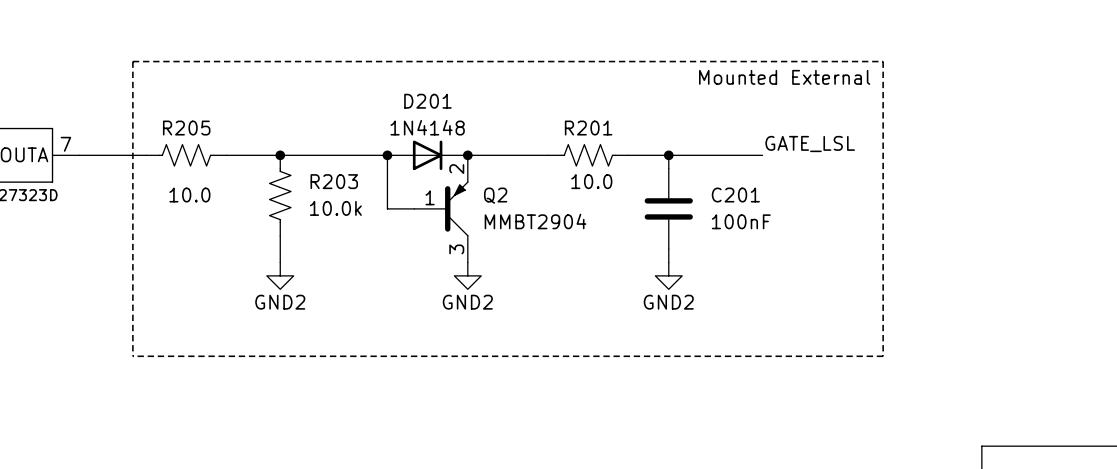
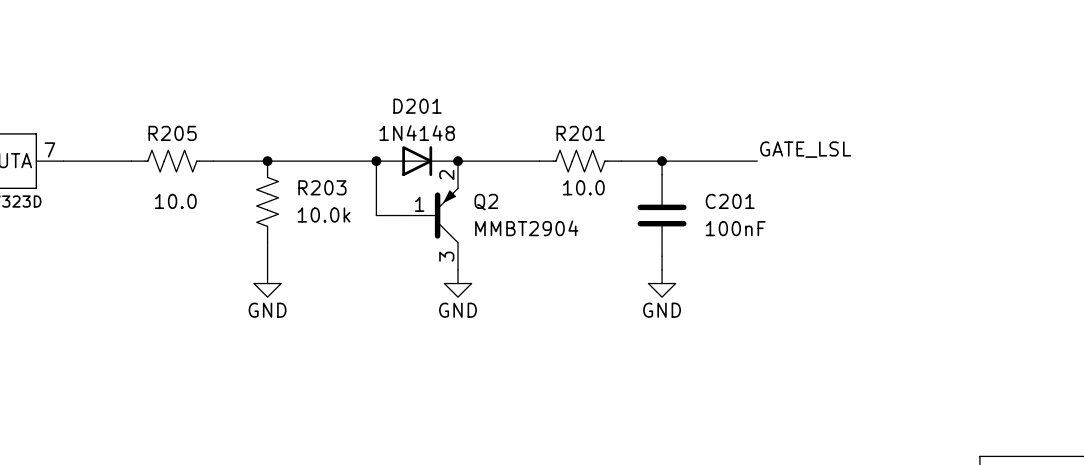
line: (132, 61) (132, 356) (883, 356) (883, 61) (132, 61) -> none
text: Mounted External (784, 77) -> none
power symbol: GND2 (280, 275) -> GND (267, 283)
power symbol: GND2 (467, 275) -> GND (458, 283)
power symbol: GND2 (668, 275) -> GND (662, 283)

